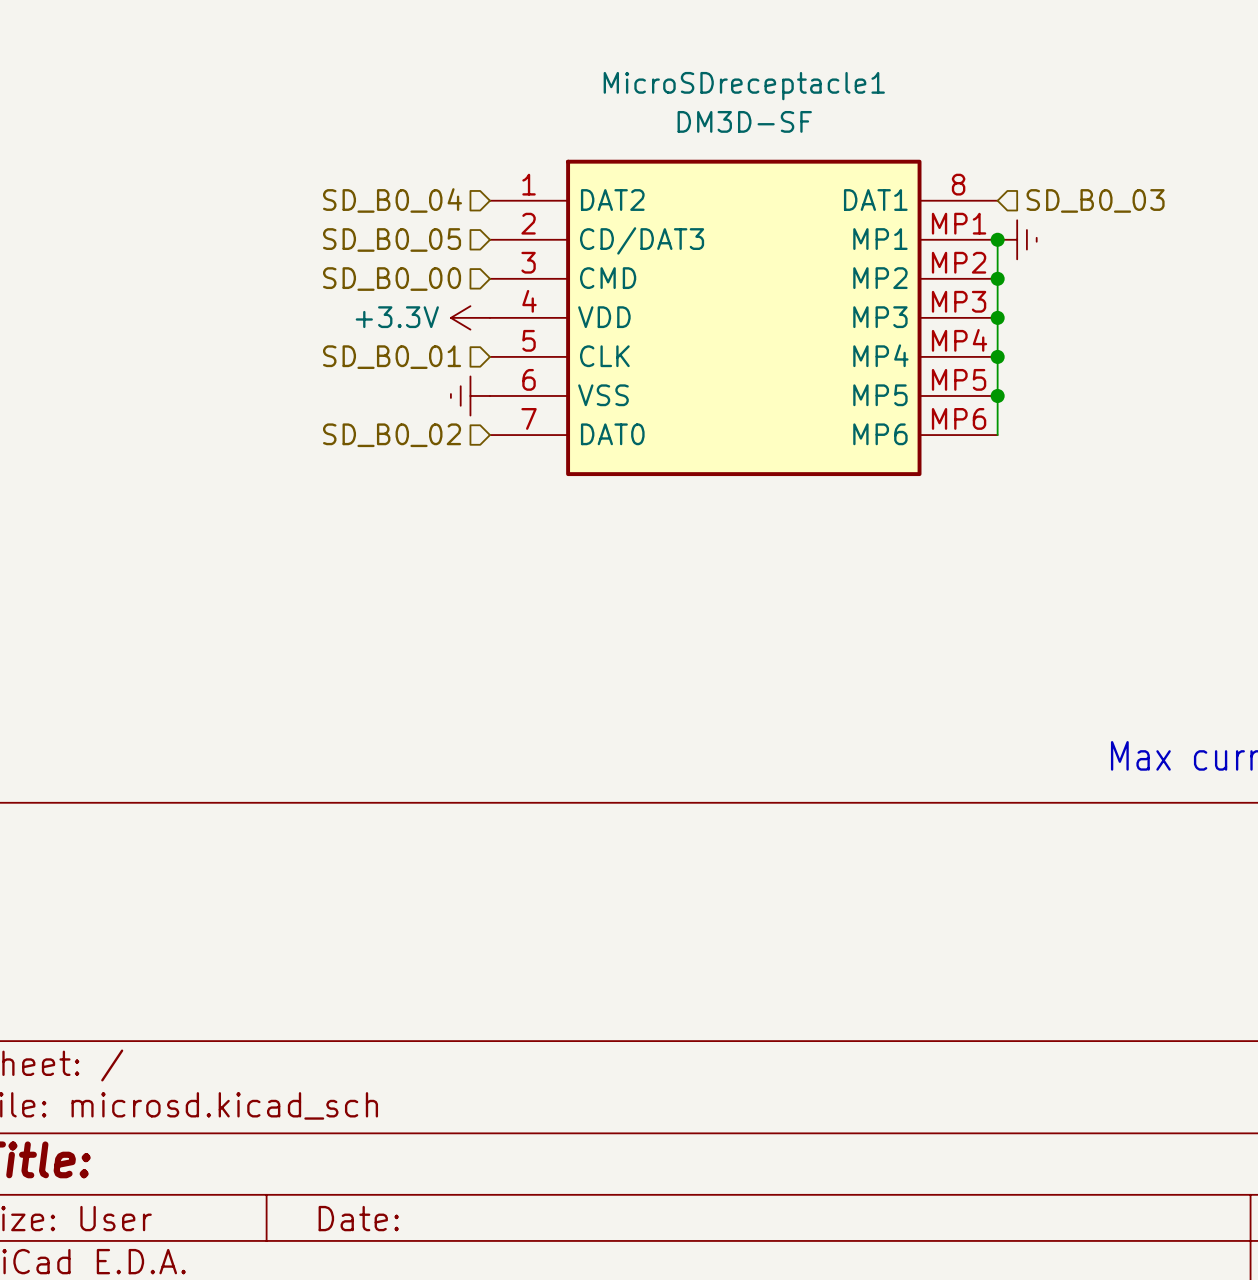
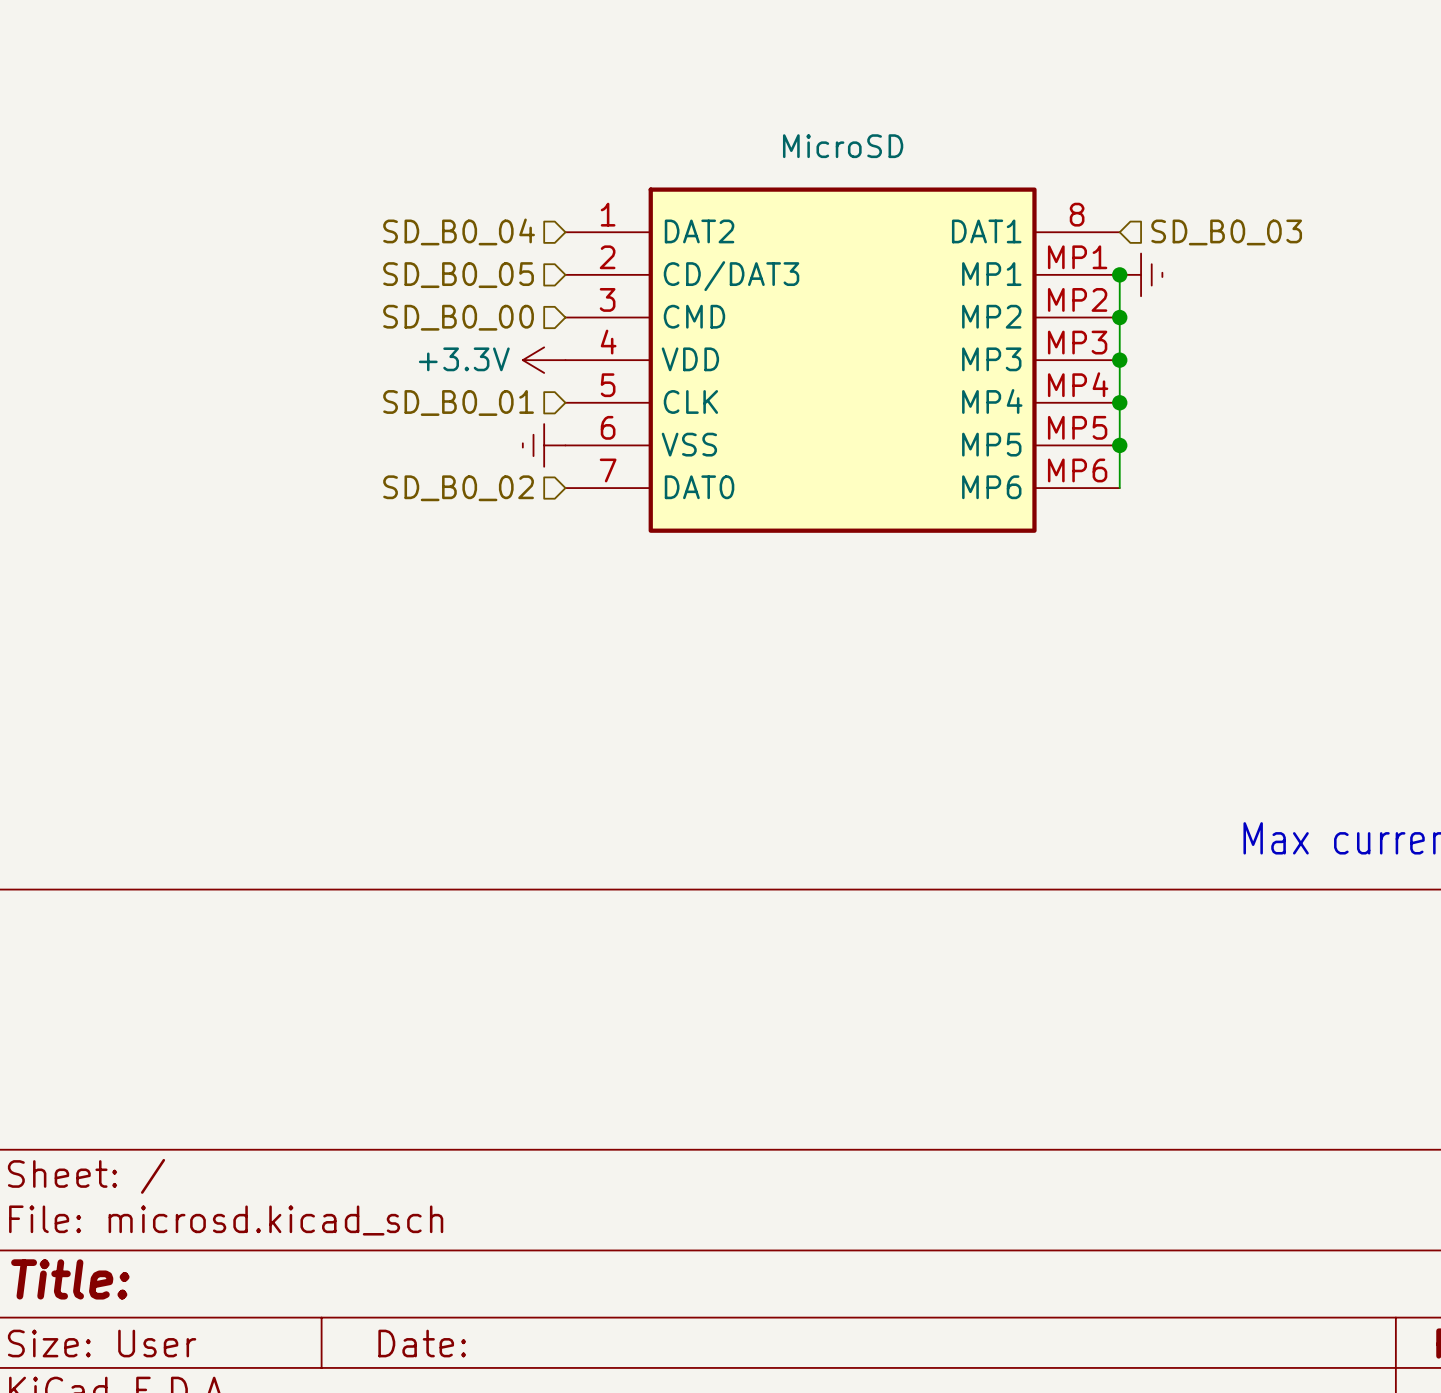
MicroSDreceptacle1 name: MicroSDreceptacle1 (744, 86) -> none
MicroSDreceptacle1 value: DM3D-SF (744, 121) -> MicroSD (843, 146)

